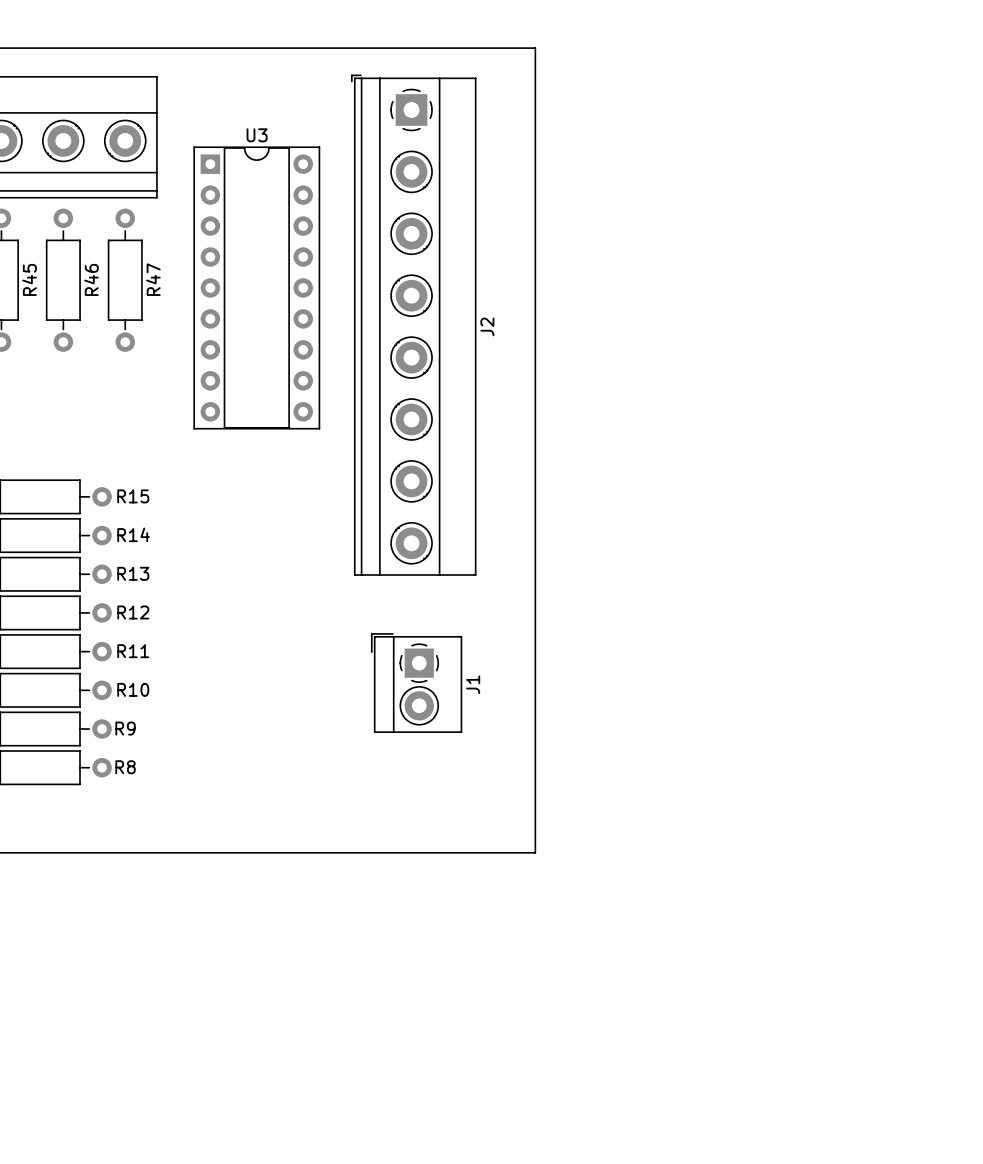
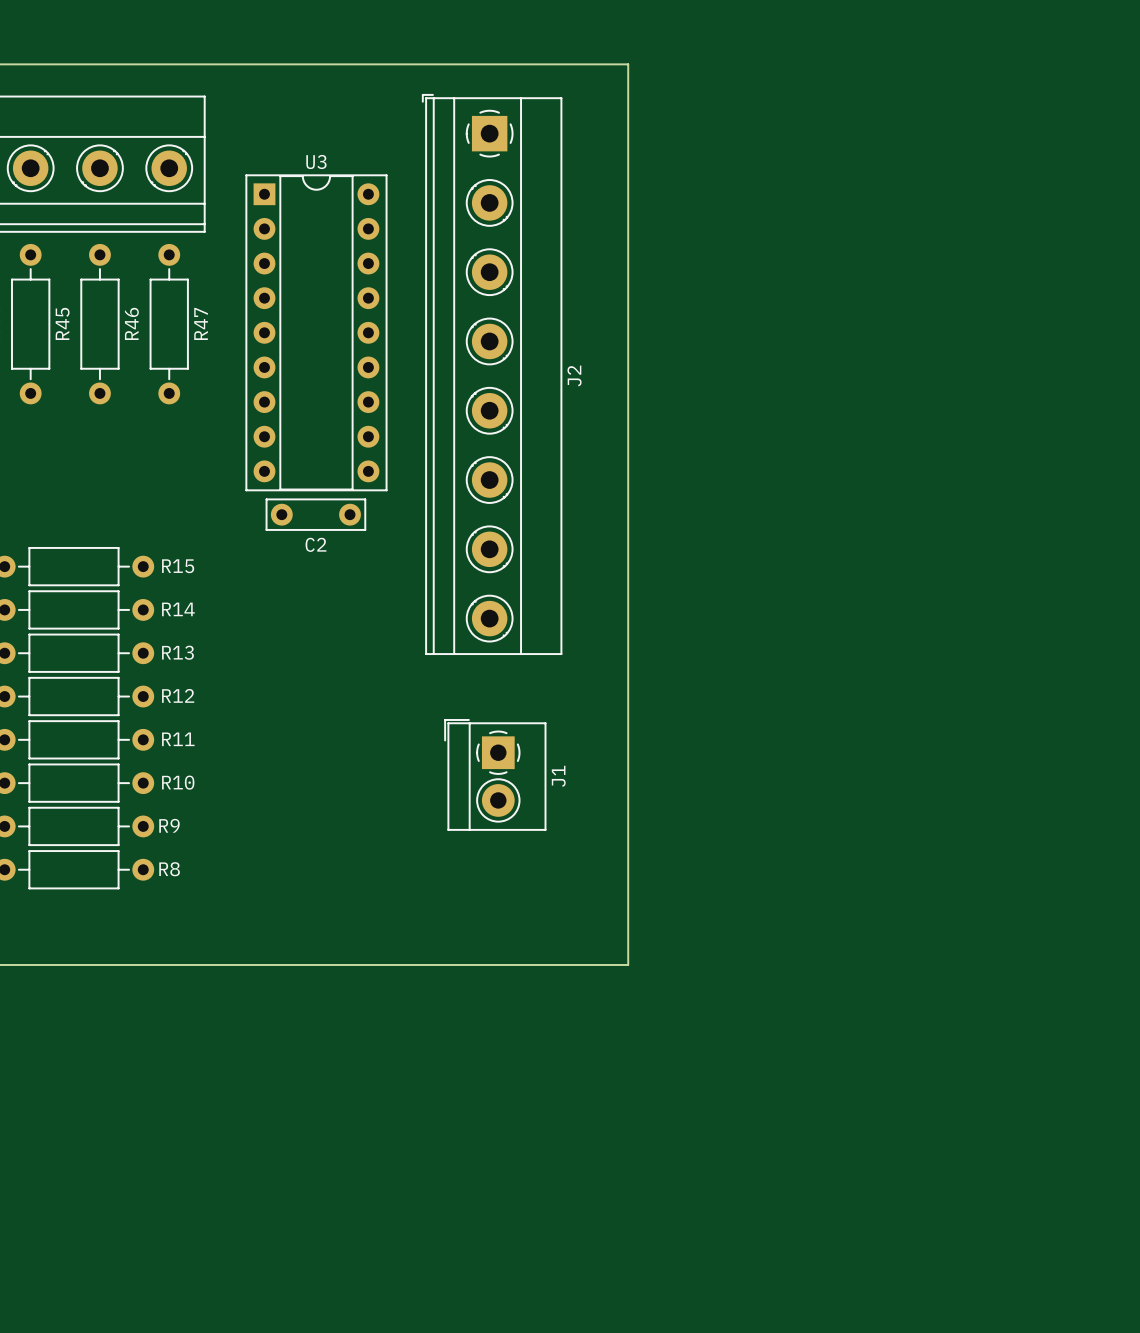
C2: none -> (315, 514)

